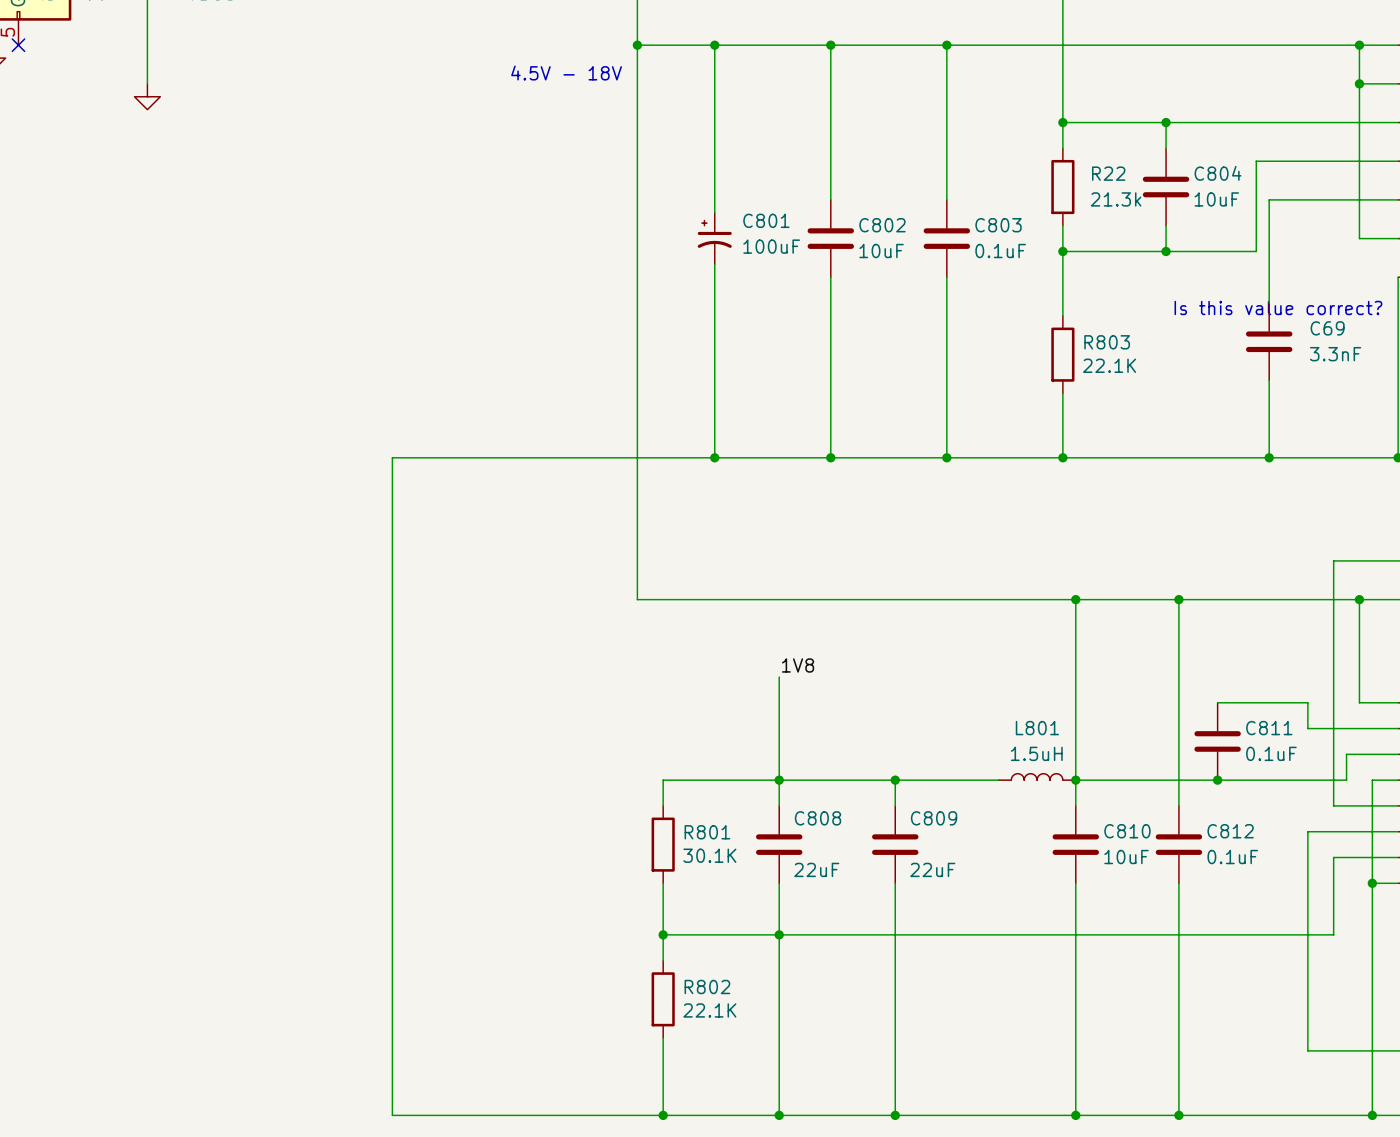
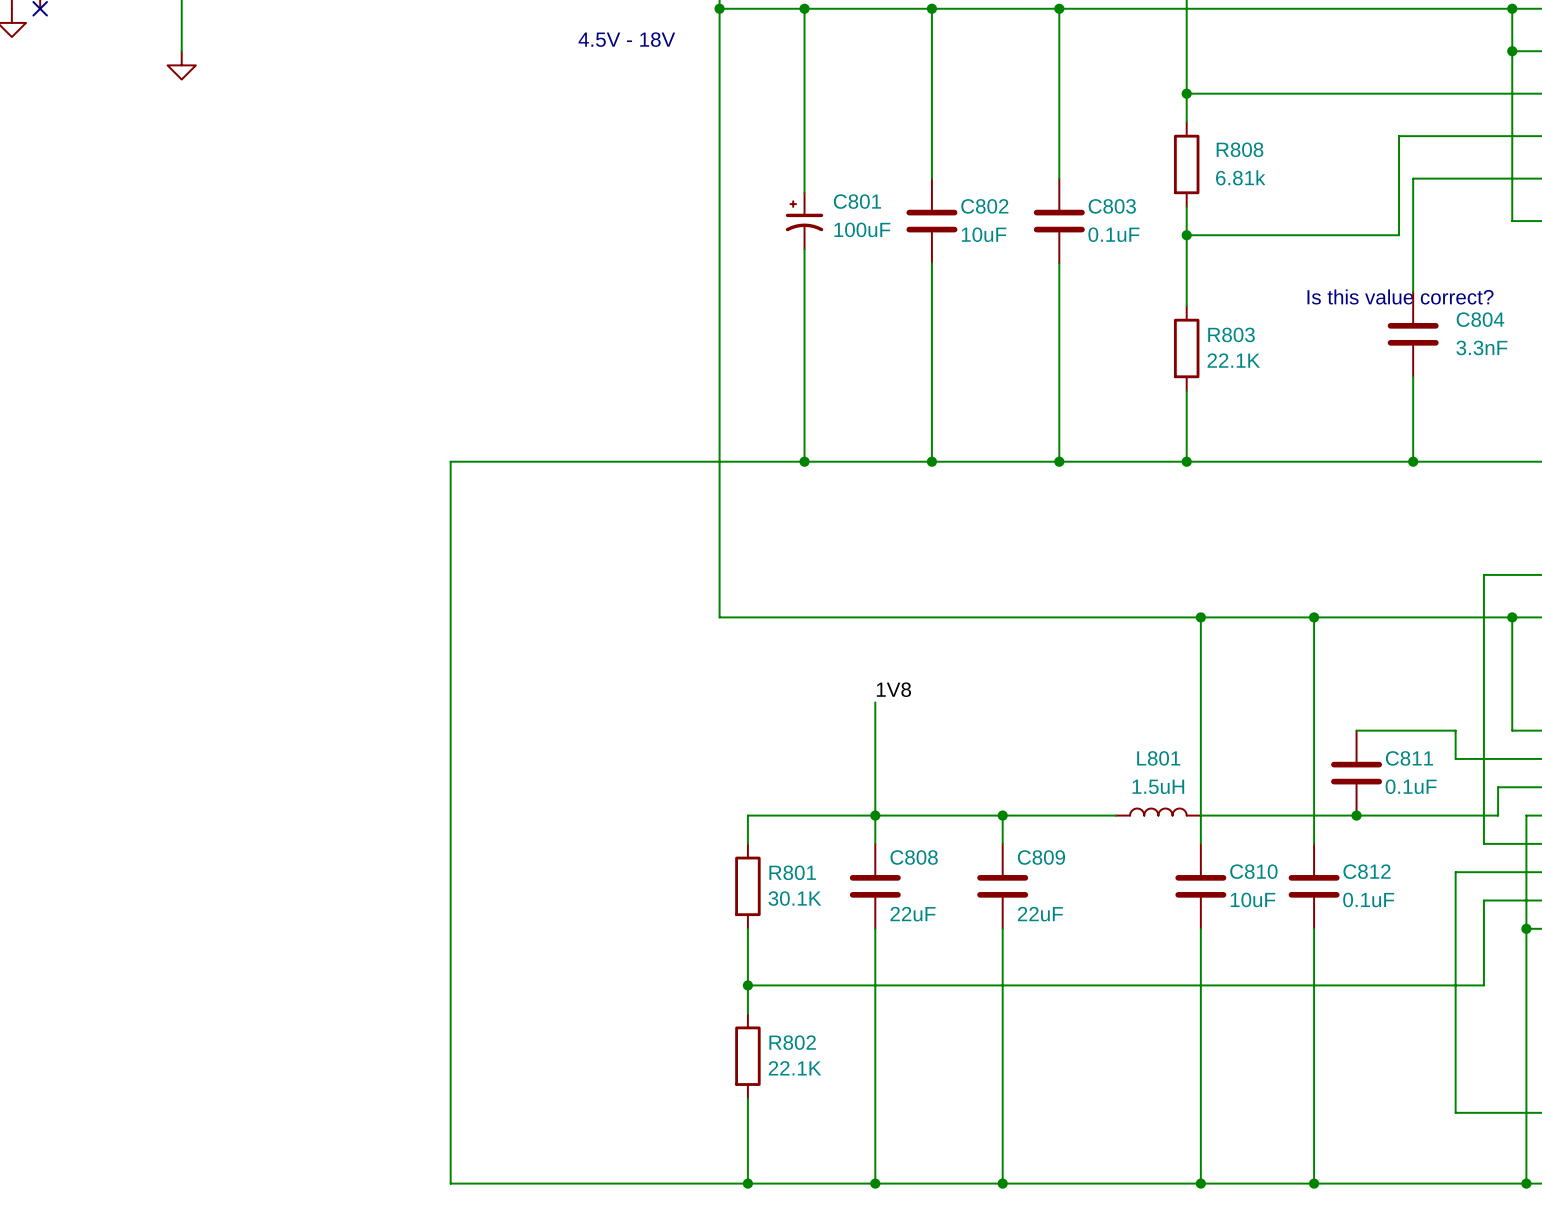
wire: (1166, 122) (1166, 148) -> none
junction: (1166, 122) -> none
R22 name: R22 (1108, 173) -> R808 (1240, 149)
C804: 10uF (1166, 187) -> none
R22 value: 21.3k (1116, 199) -> 6.81k (1240, 177)
wire: (1166, 225) (1166, 251) -> none
junction: (1166, 251) -> none
C69 name: C69 (1327, 328) -> C804 (1480, 319)
junction: (1075, 780) -> none
junction: (779, 934) -> none

